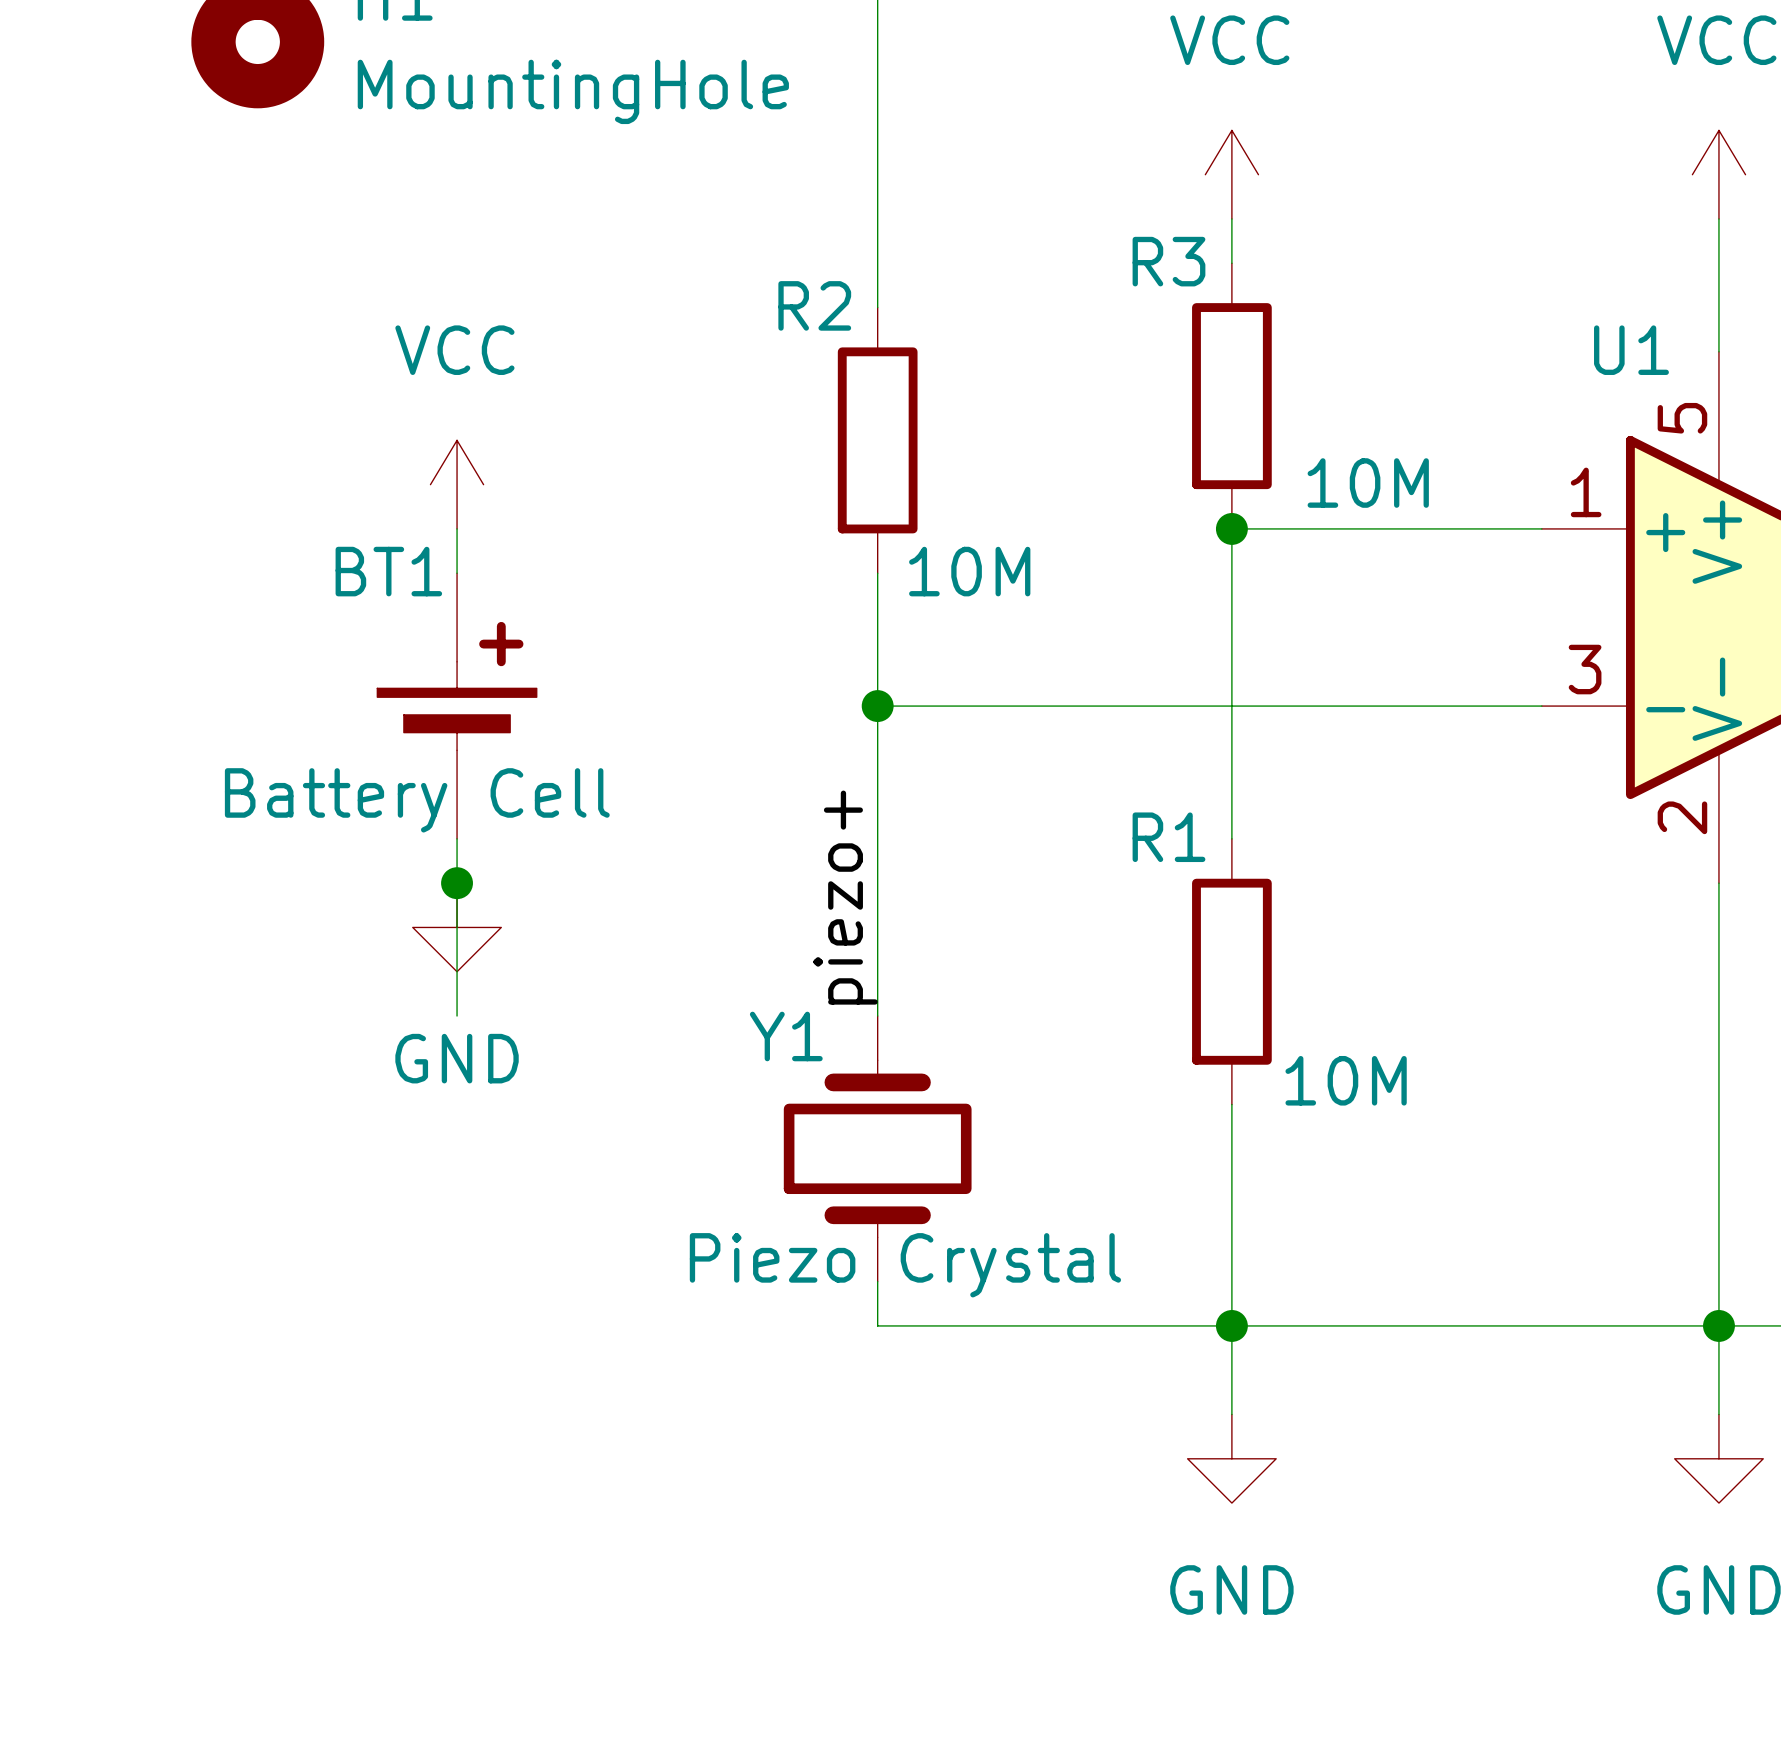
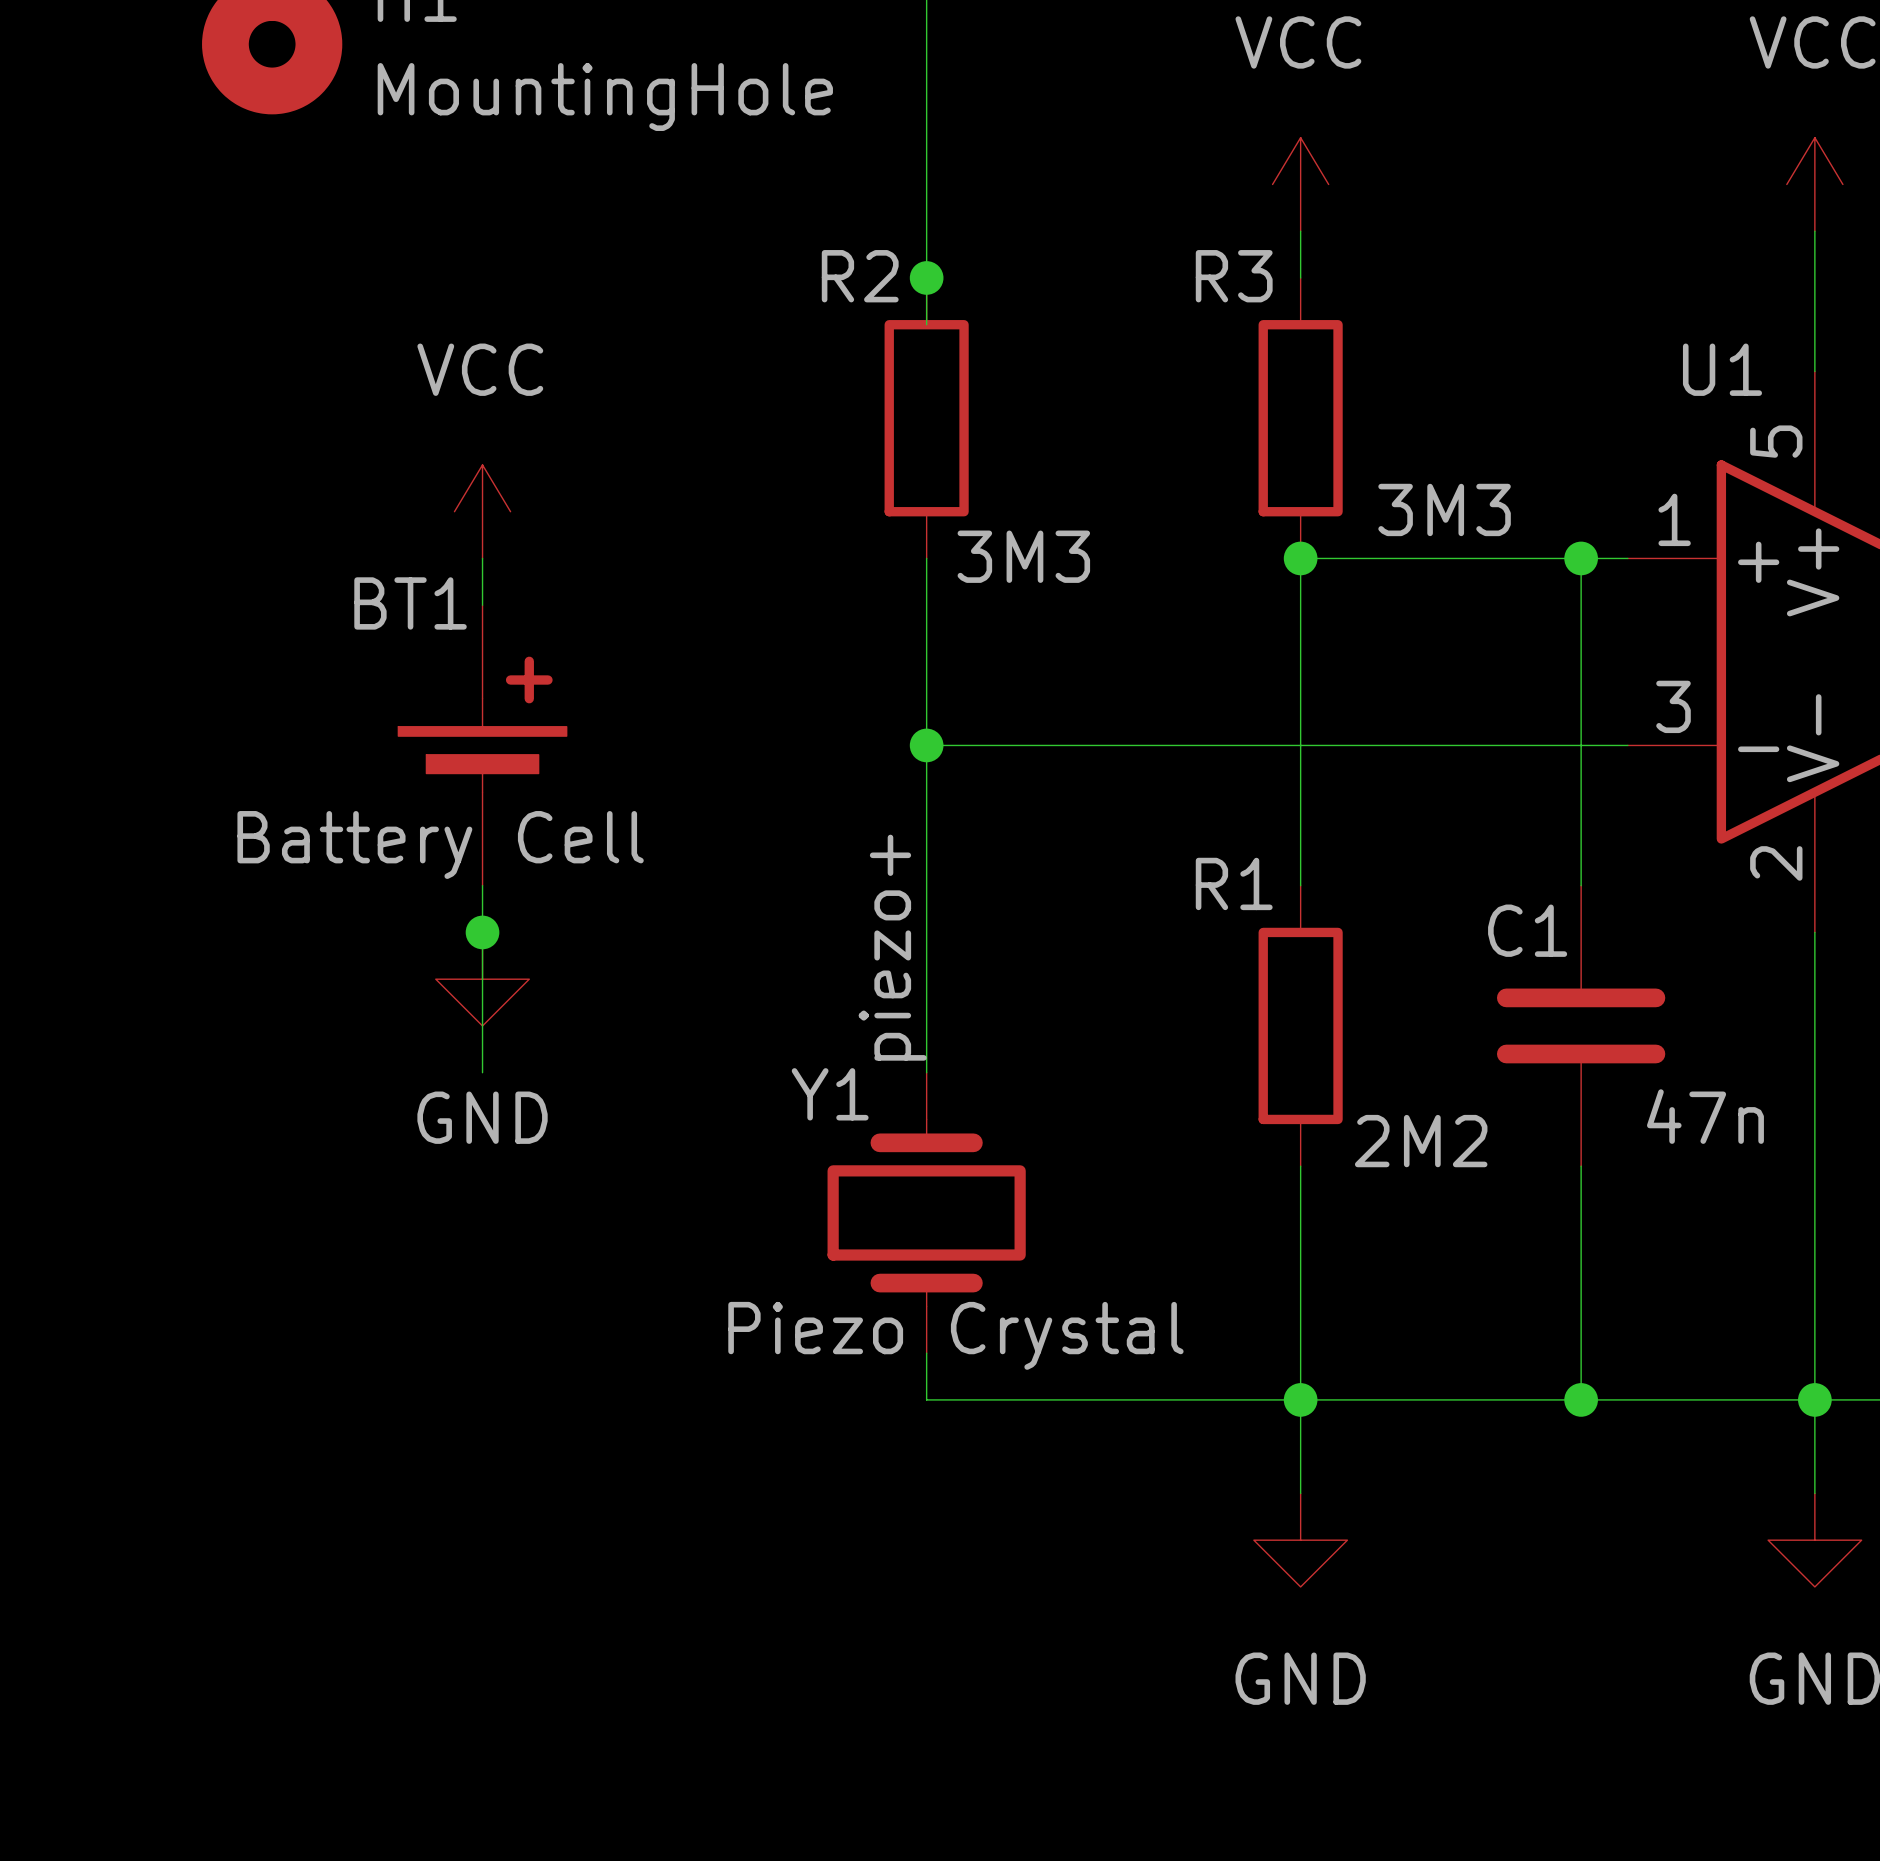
junction: none -> (926, 277)
R2 position: (877, 440) -> (926, 418)
R3 value: 10M (1368, 483) -> 3M3 (1444, 509)
wire: none -> (1581, 558) (1581, 885)
junction: none -> (1581, 558)
R2 value: 10M (969, 571) -> 3M3 (1023, 556)
C1: none -> 47n (1581, 1025)
R1 value: 10M (1346, 1080) -> 2M2 (1421, 1141)
wire: none -> (1581, 1166) (1581, 1399)
junction: none -> (1581, 1399)

